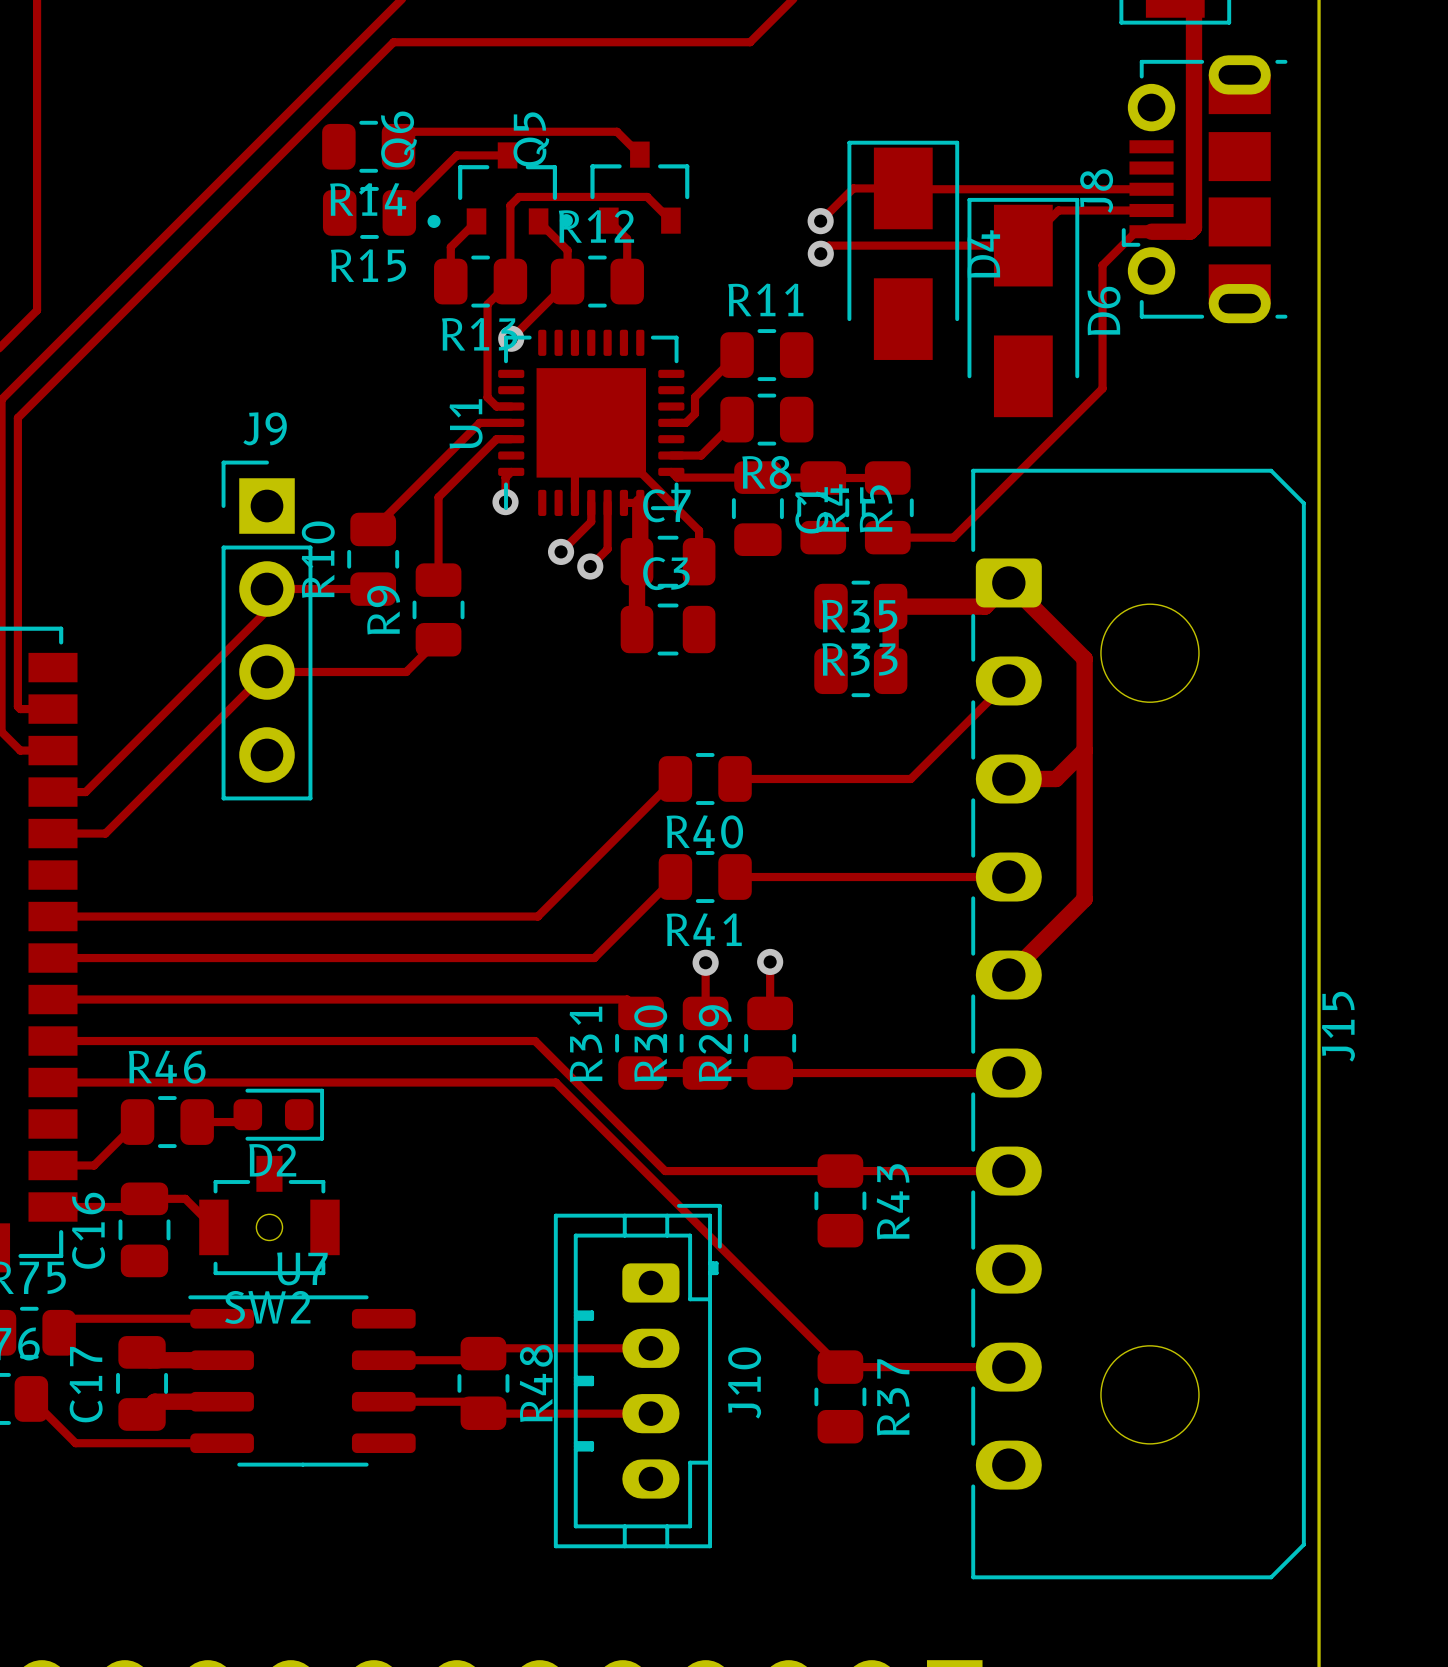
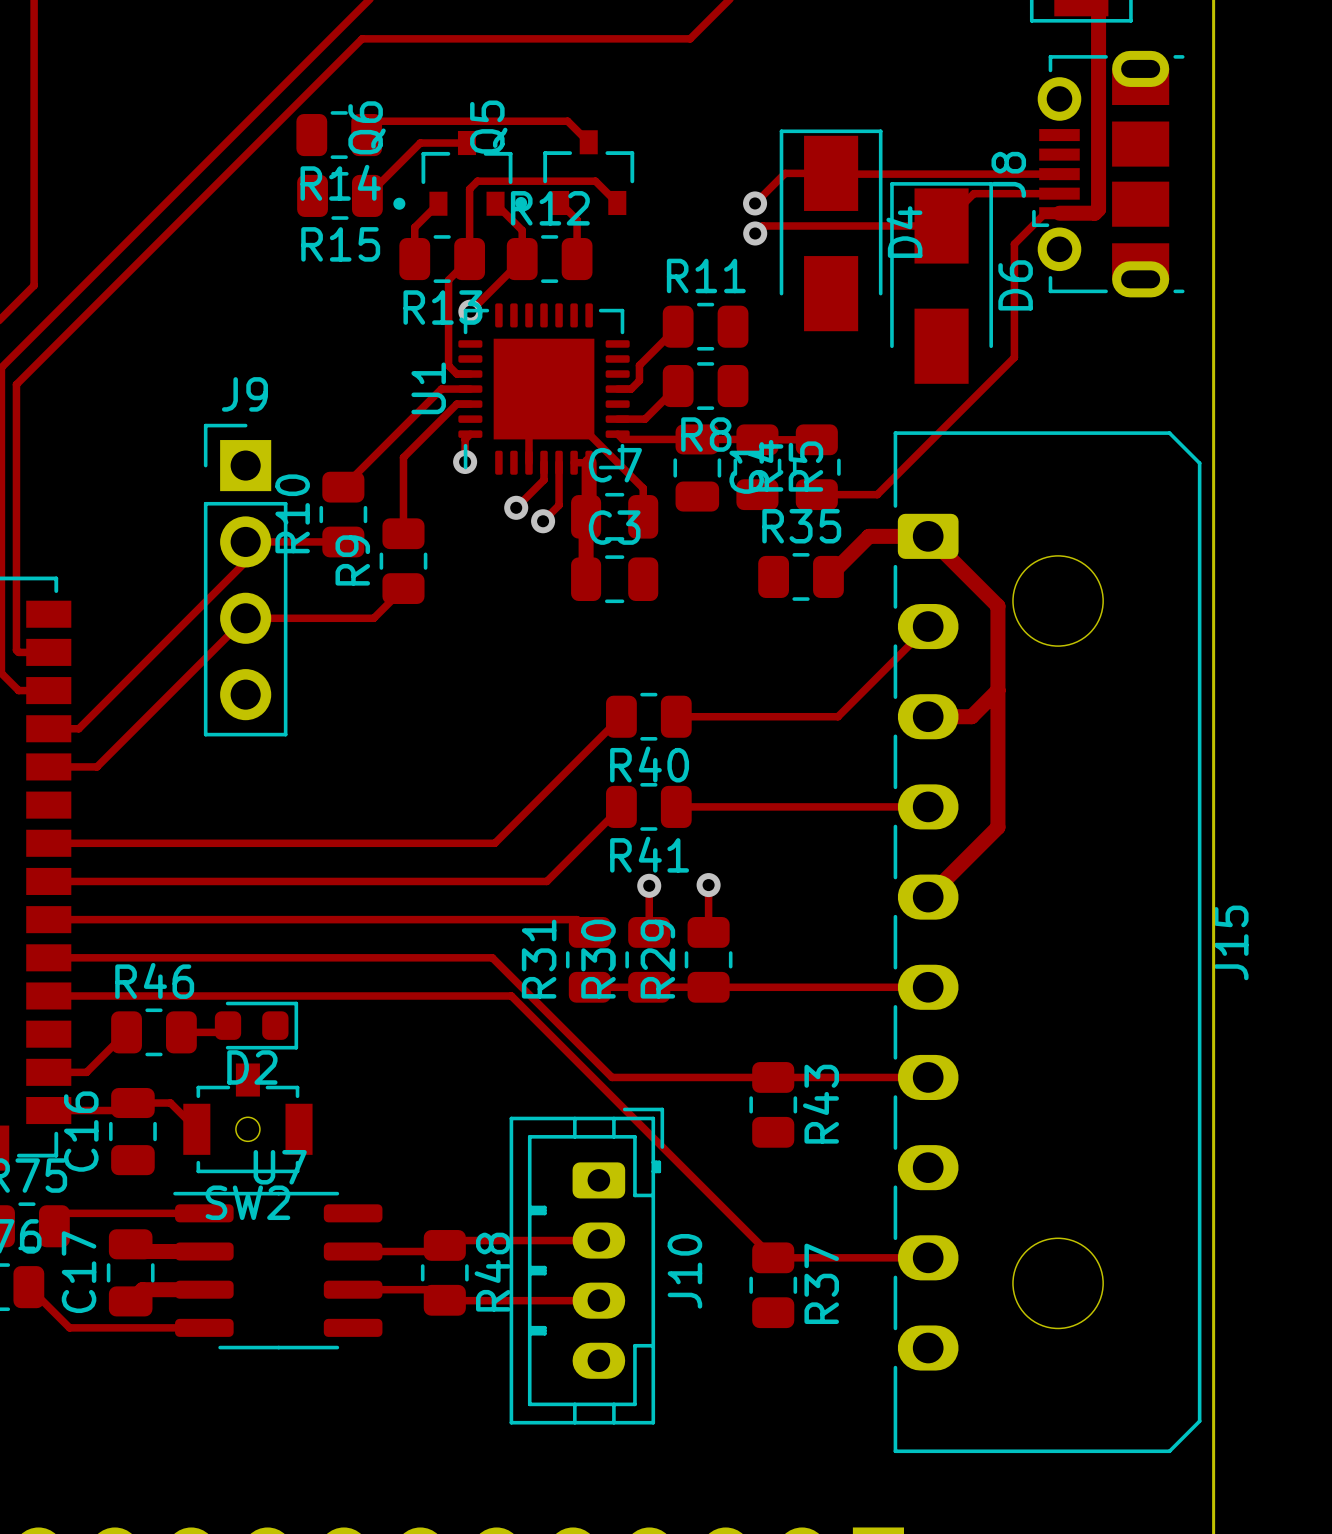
track: (1008, 582) (985, 606) (890, 606) (890, 671) -> (928, 536) (869, 536) (828, 576)
R33: (860, 606) -> none
R35 position: (860, 671) -> (801, 576)

